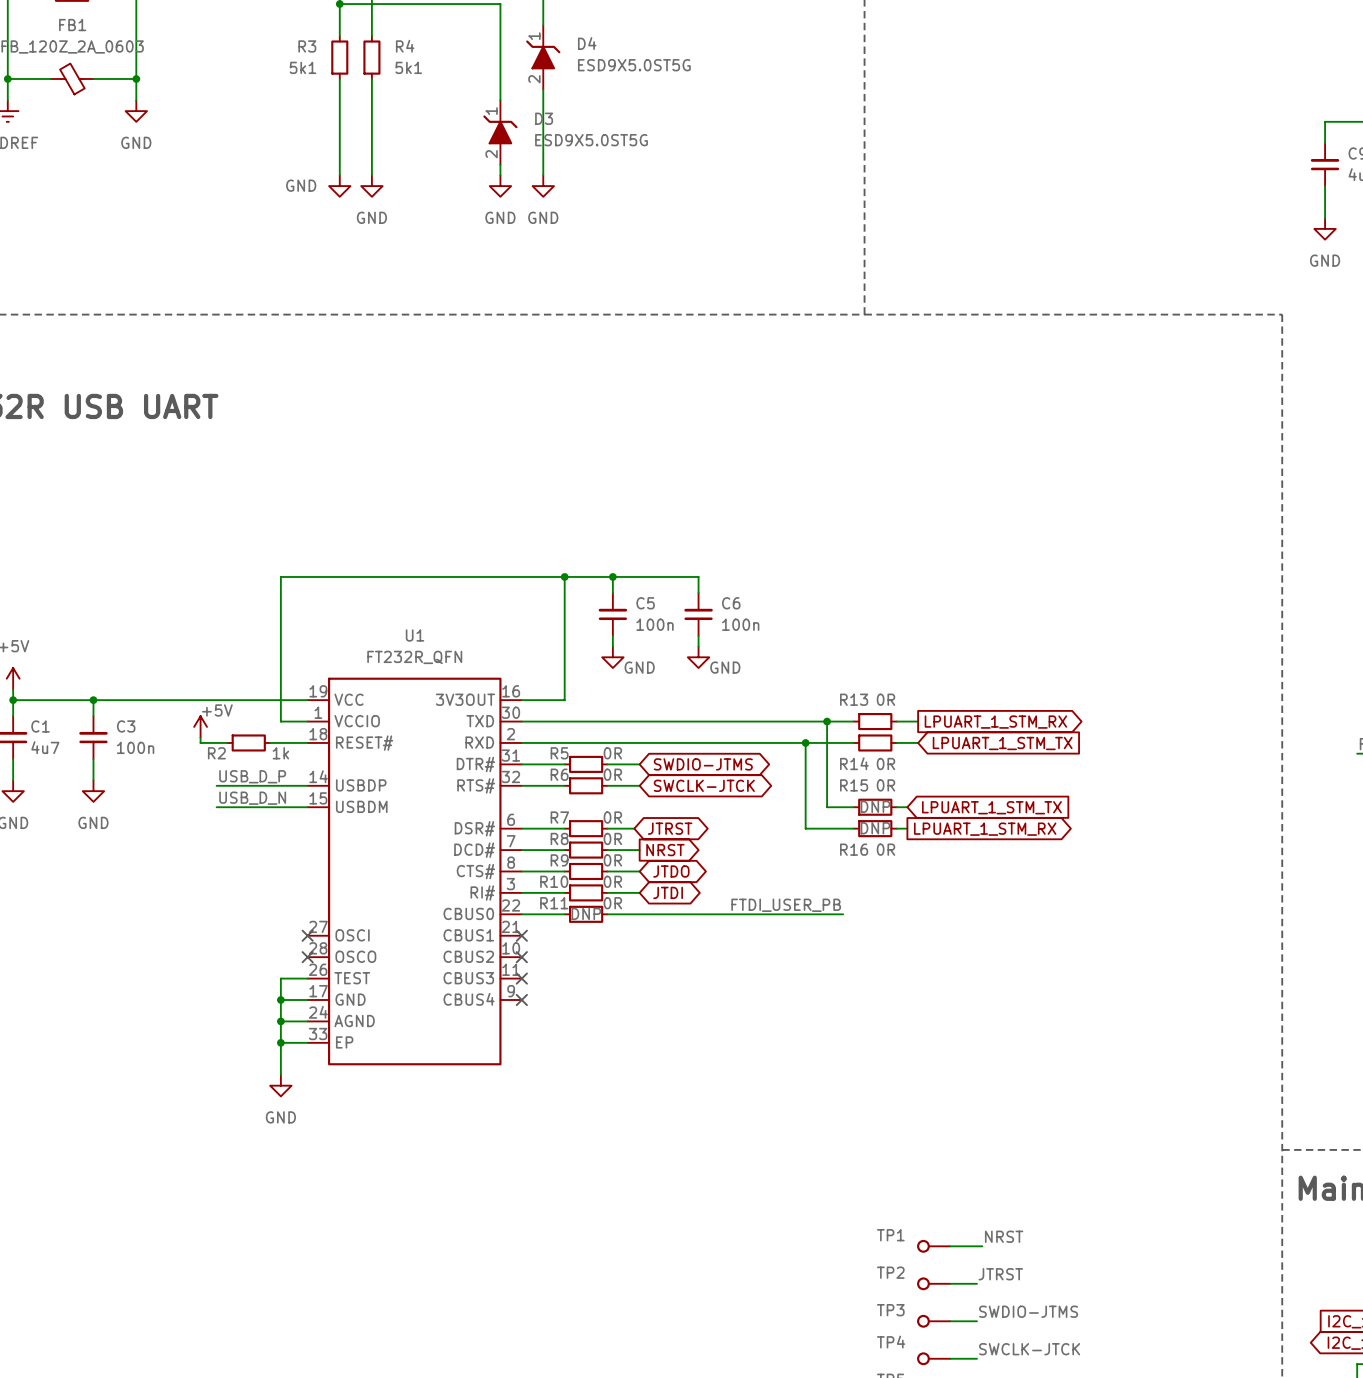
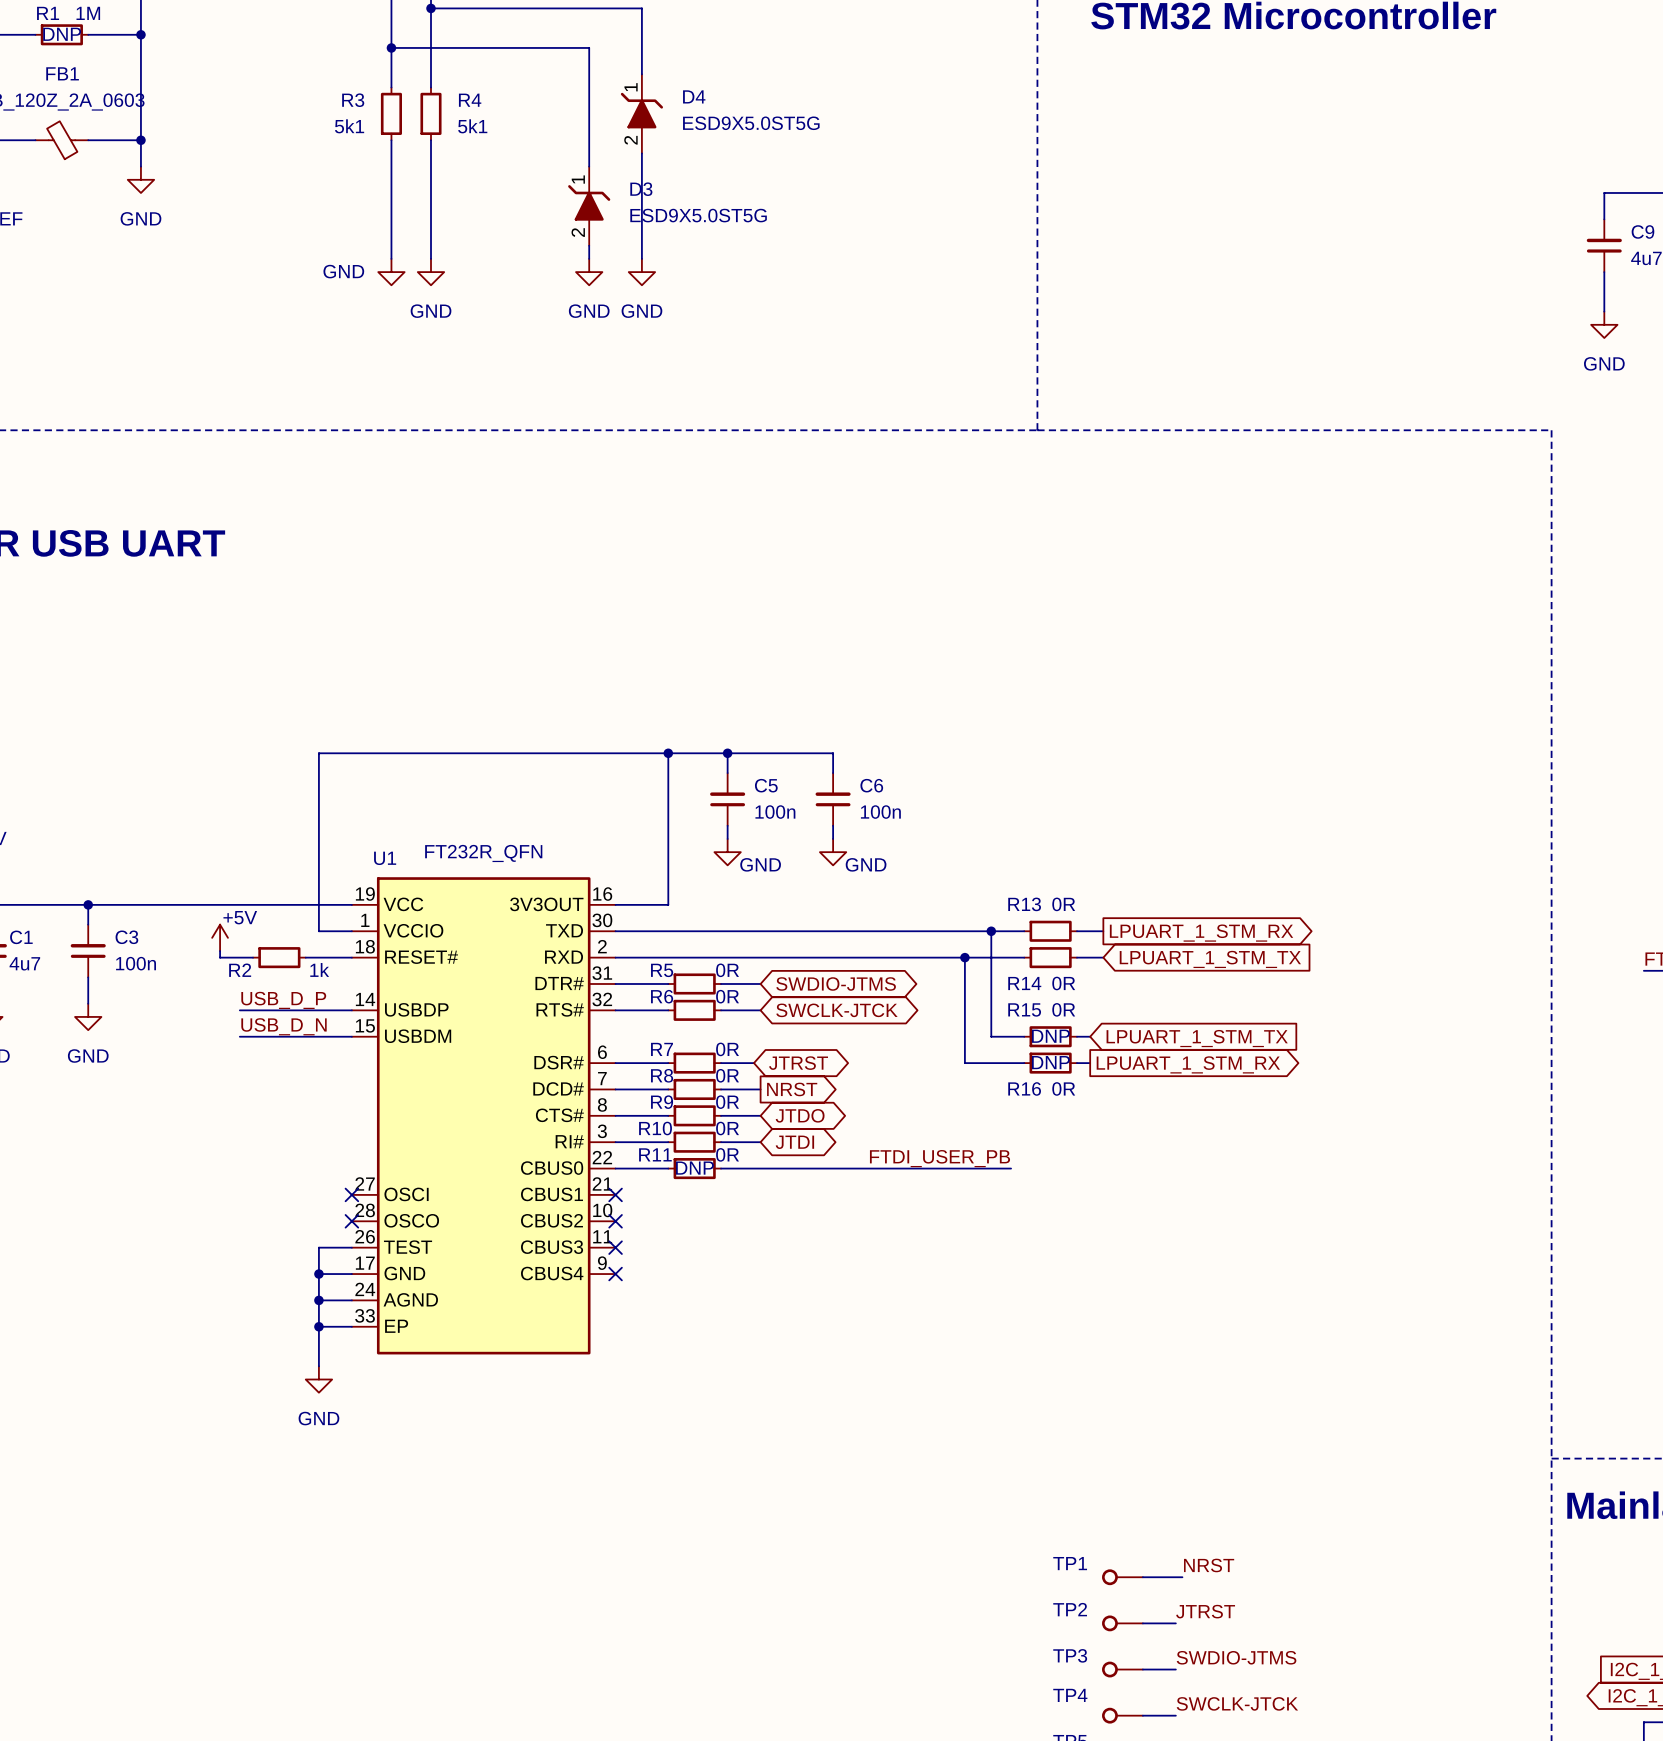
U1 name position: U1 (415, 635) -> U1 (385, 858)

